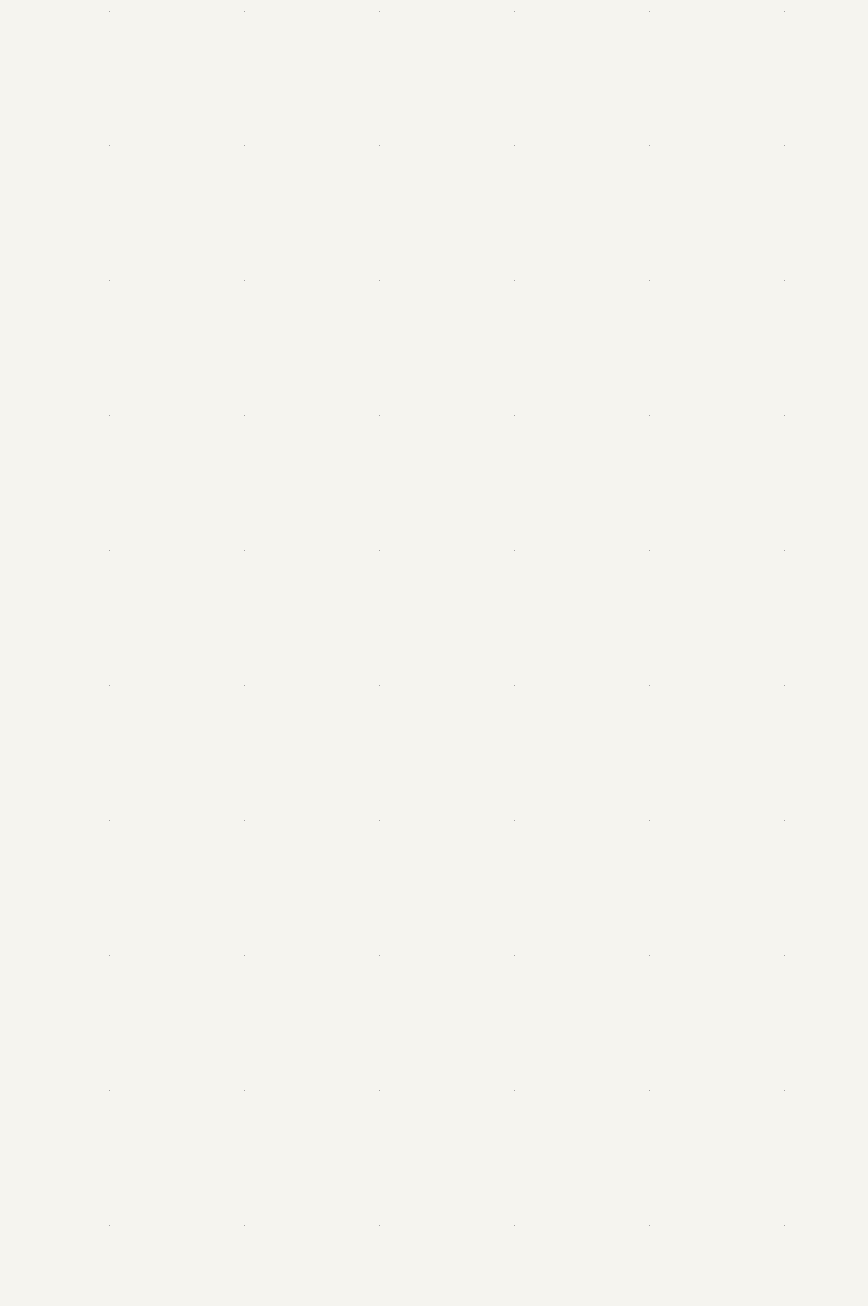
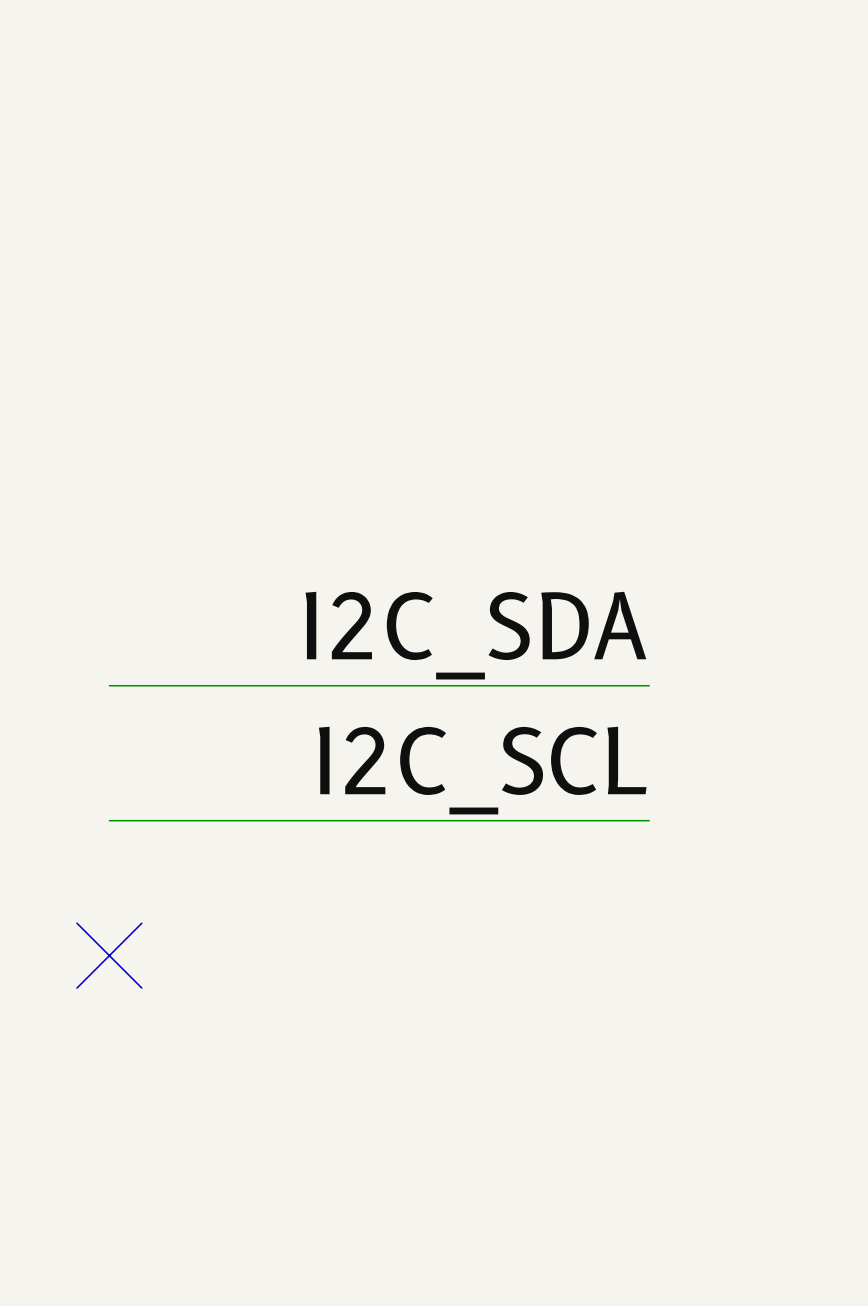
label: none -> I2C_SDA (475, 635)
wire: none -> (109, 685) (649, 685)
label: none -> I2C_SCL (482, 770)
wire: none -> (109, 820) (649, 820)
no-connect mark: none -> (109, 955)

